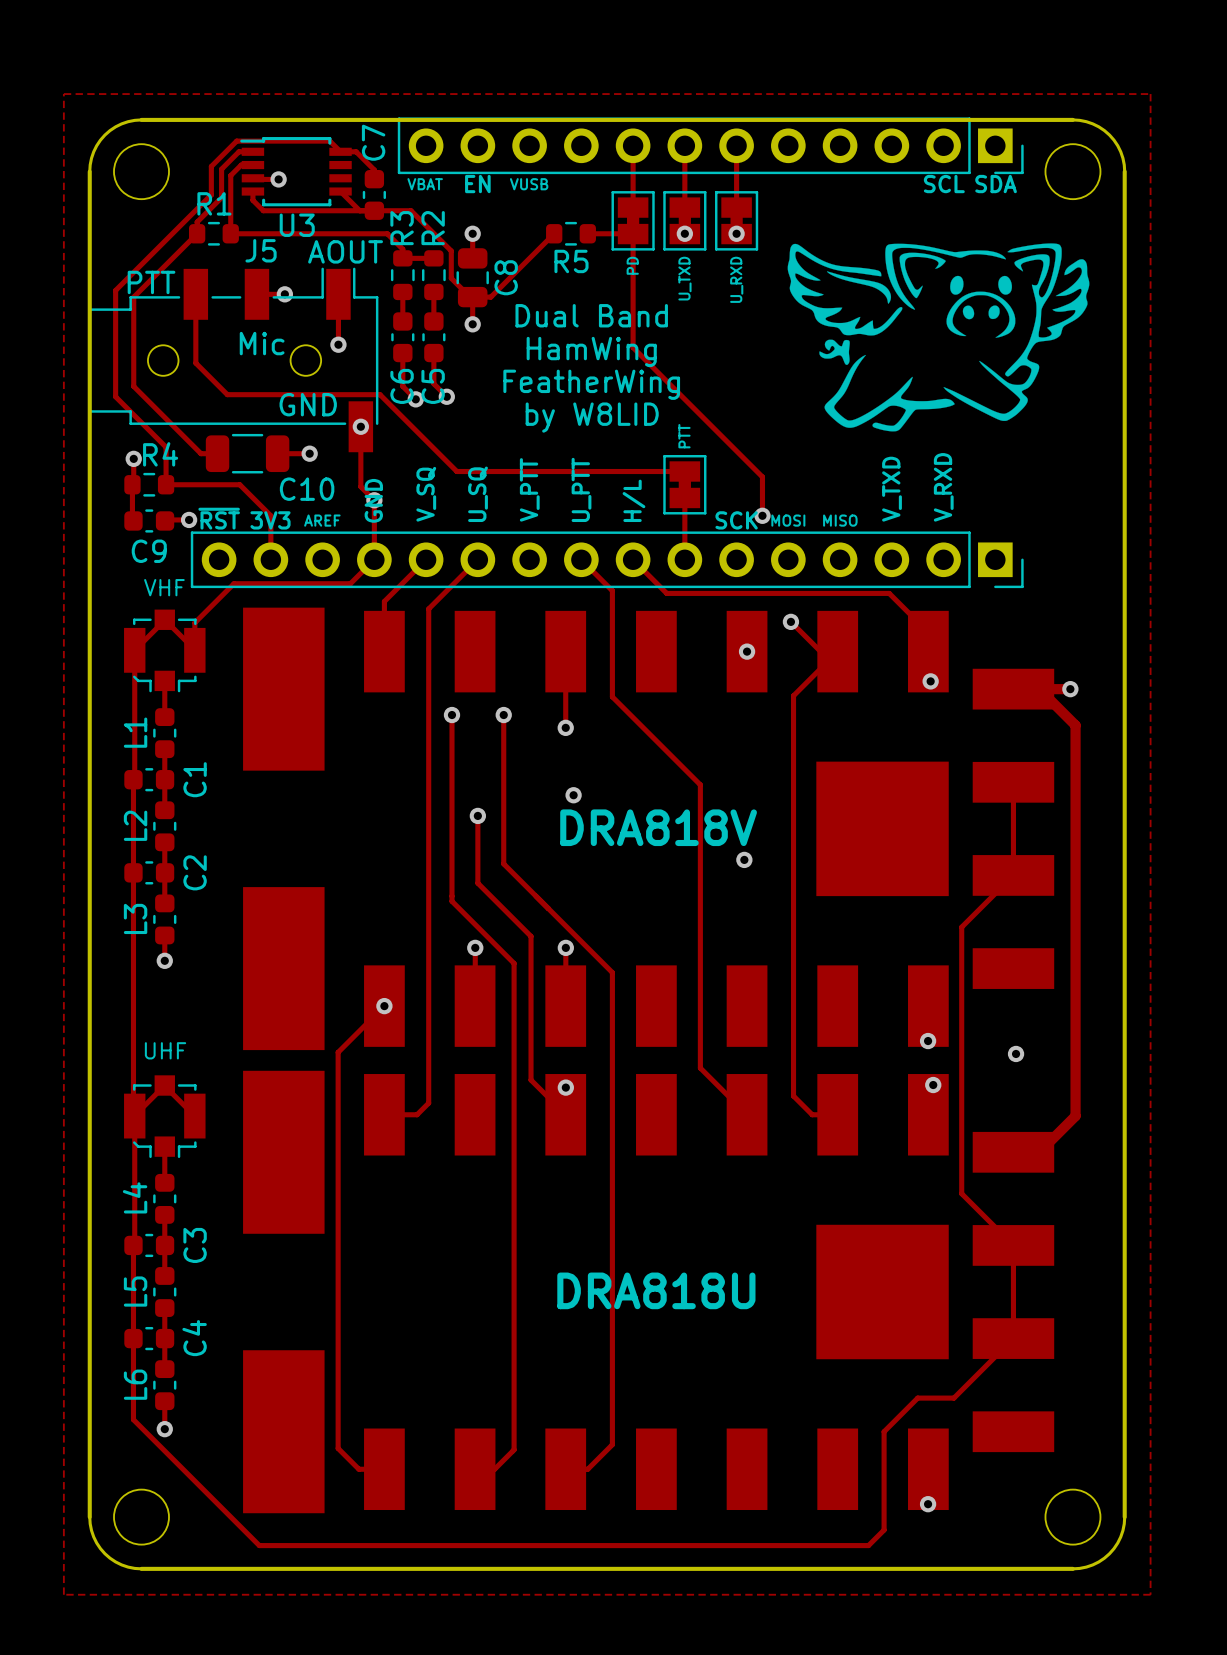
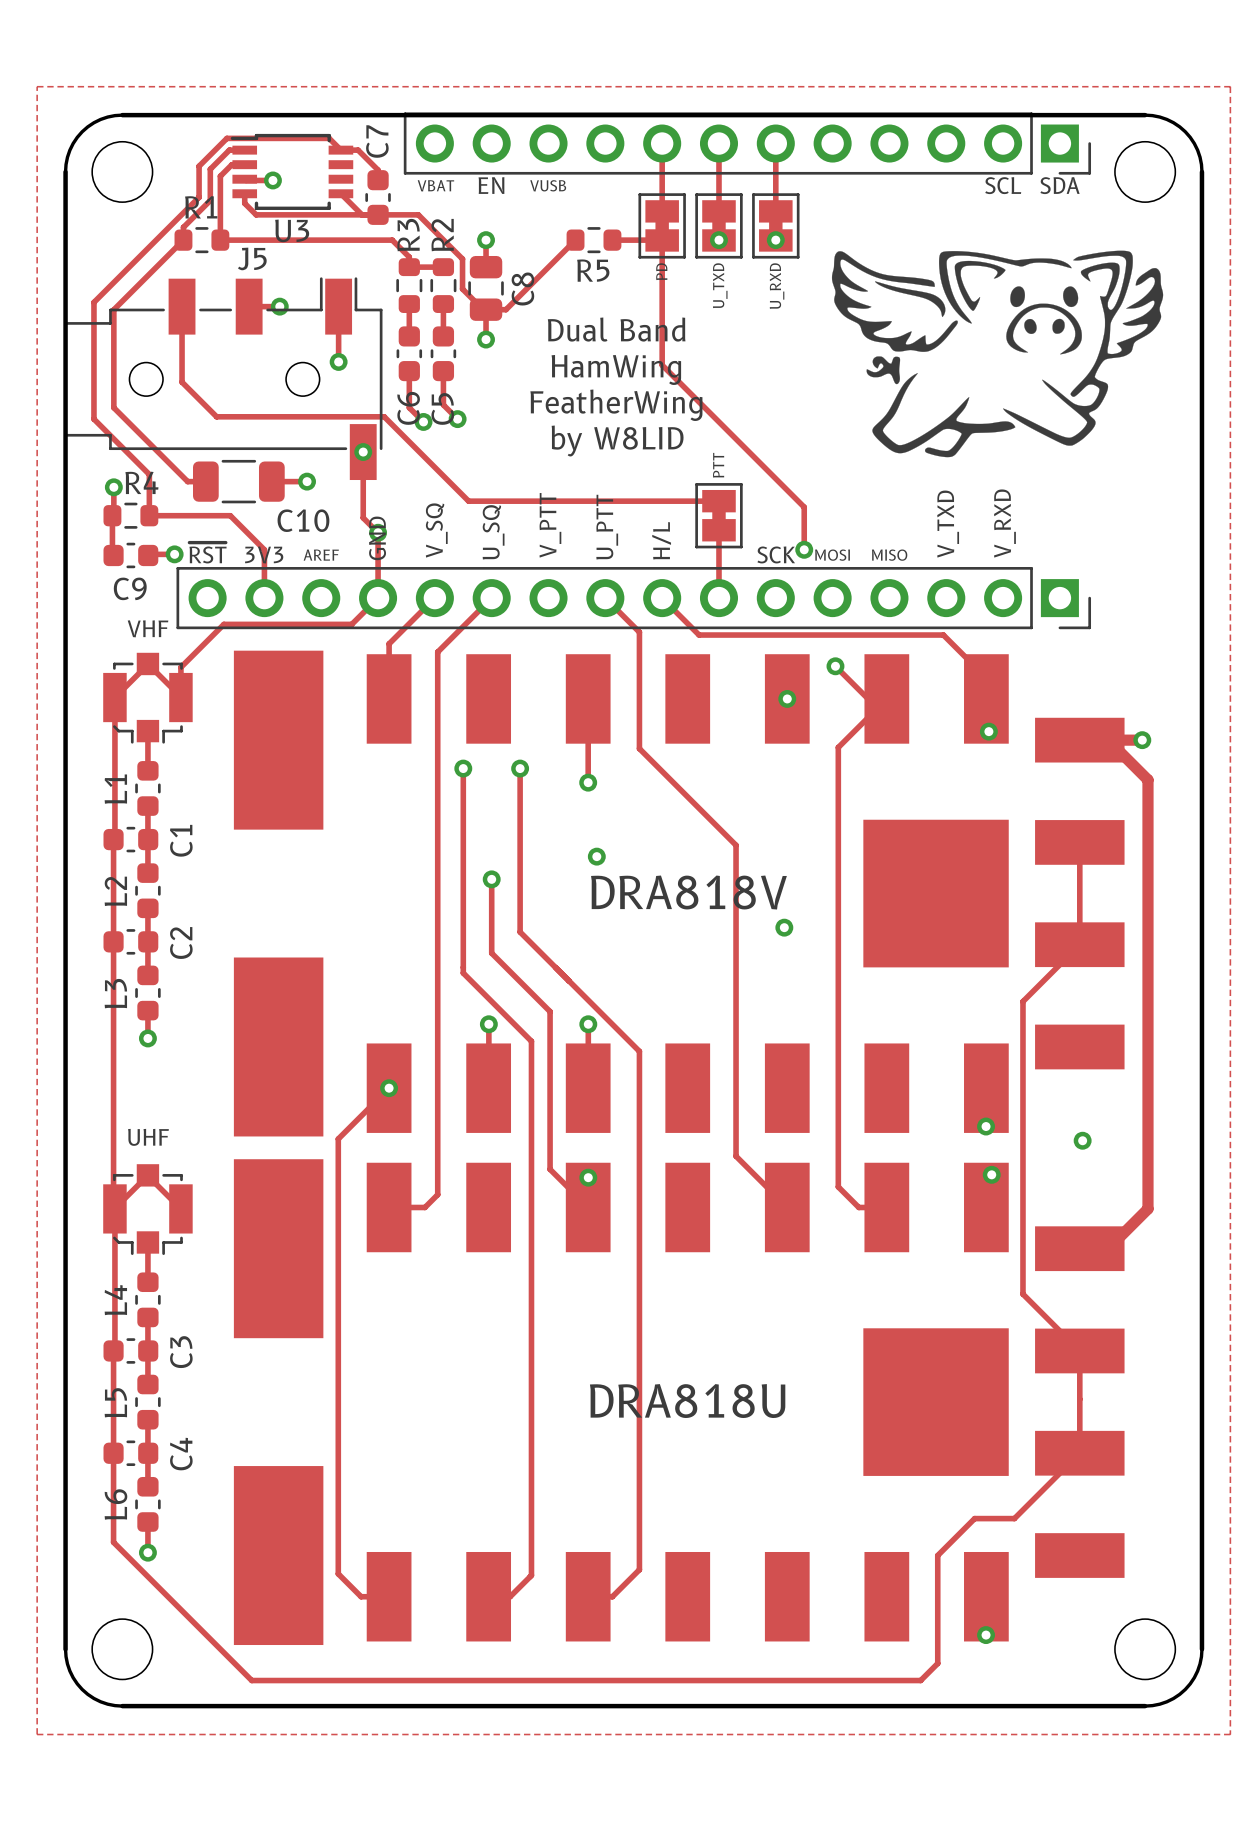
text: AOUT (345, 251) -> none
text: PTT (151, 282) -> none
text: Mic (262, 343) -> none
text: GND (308, 404) -> none

